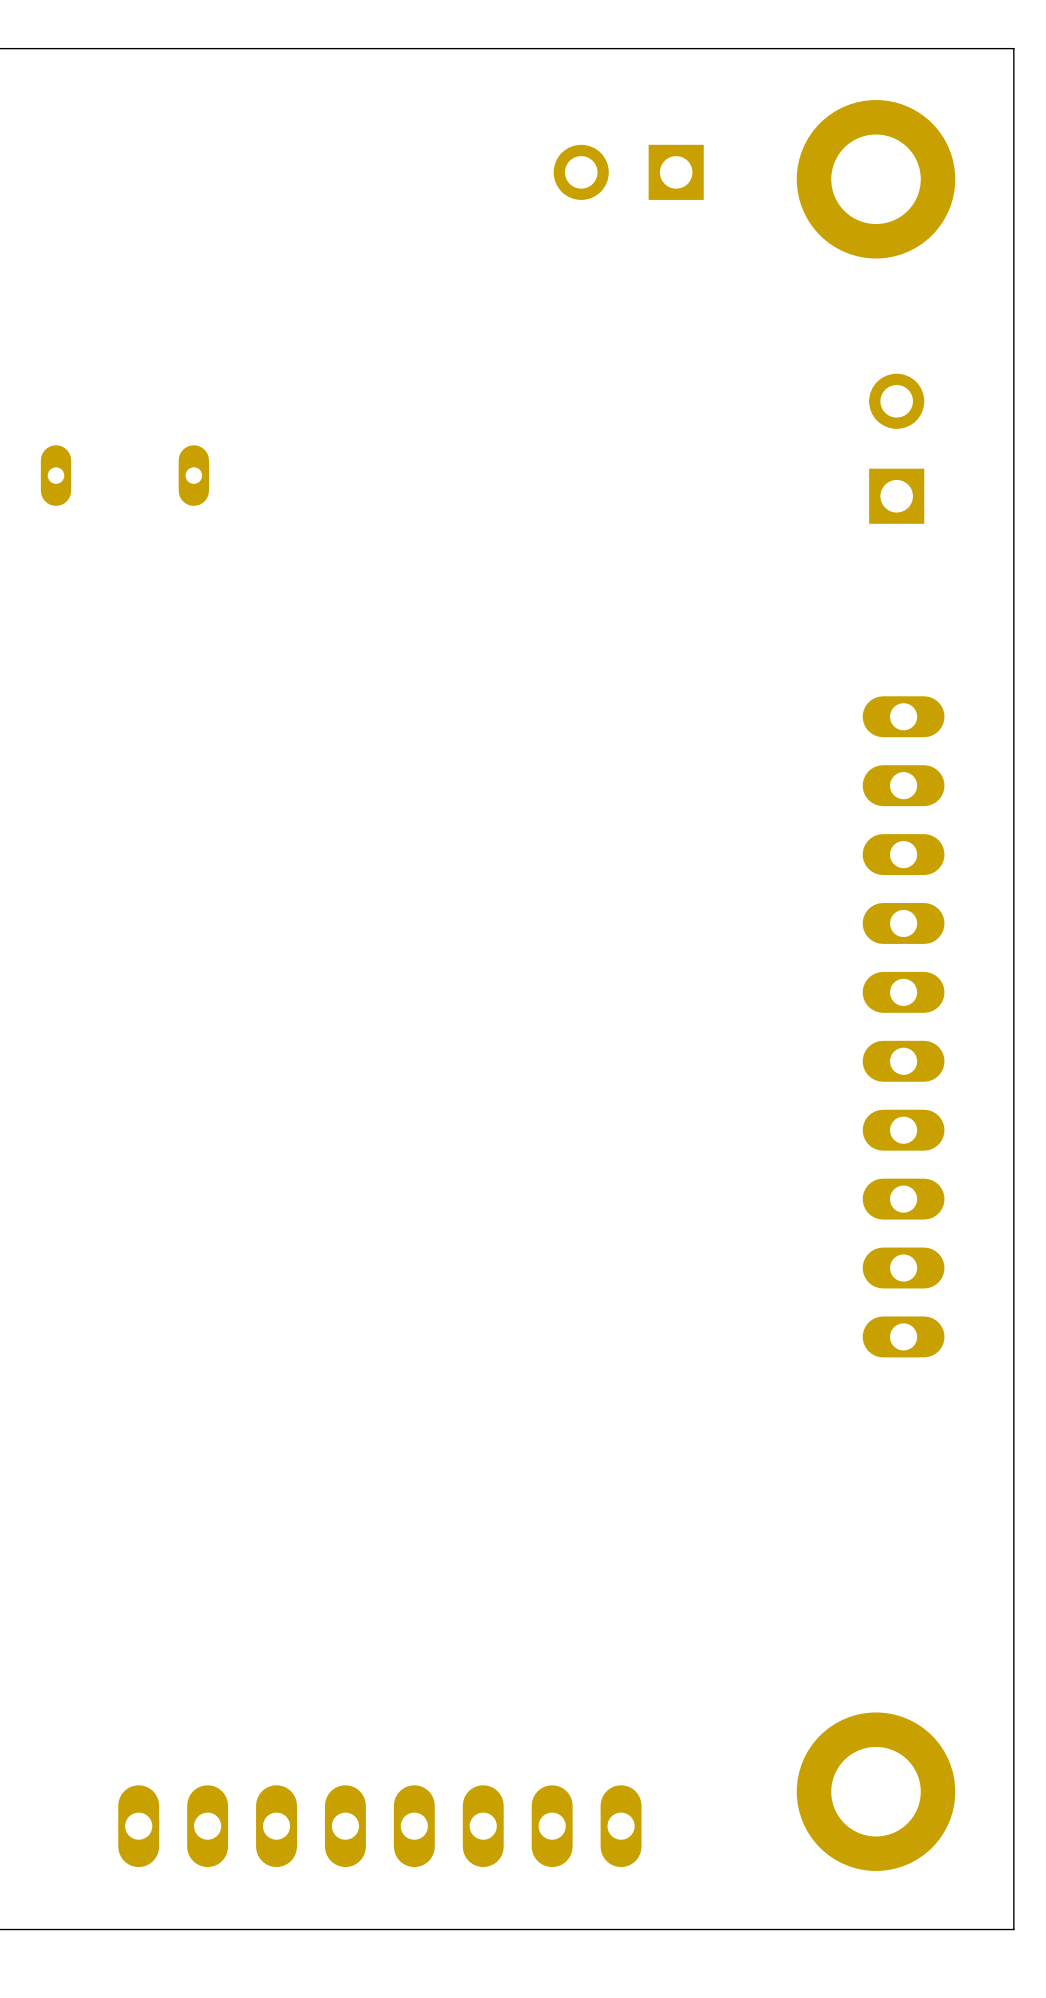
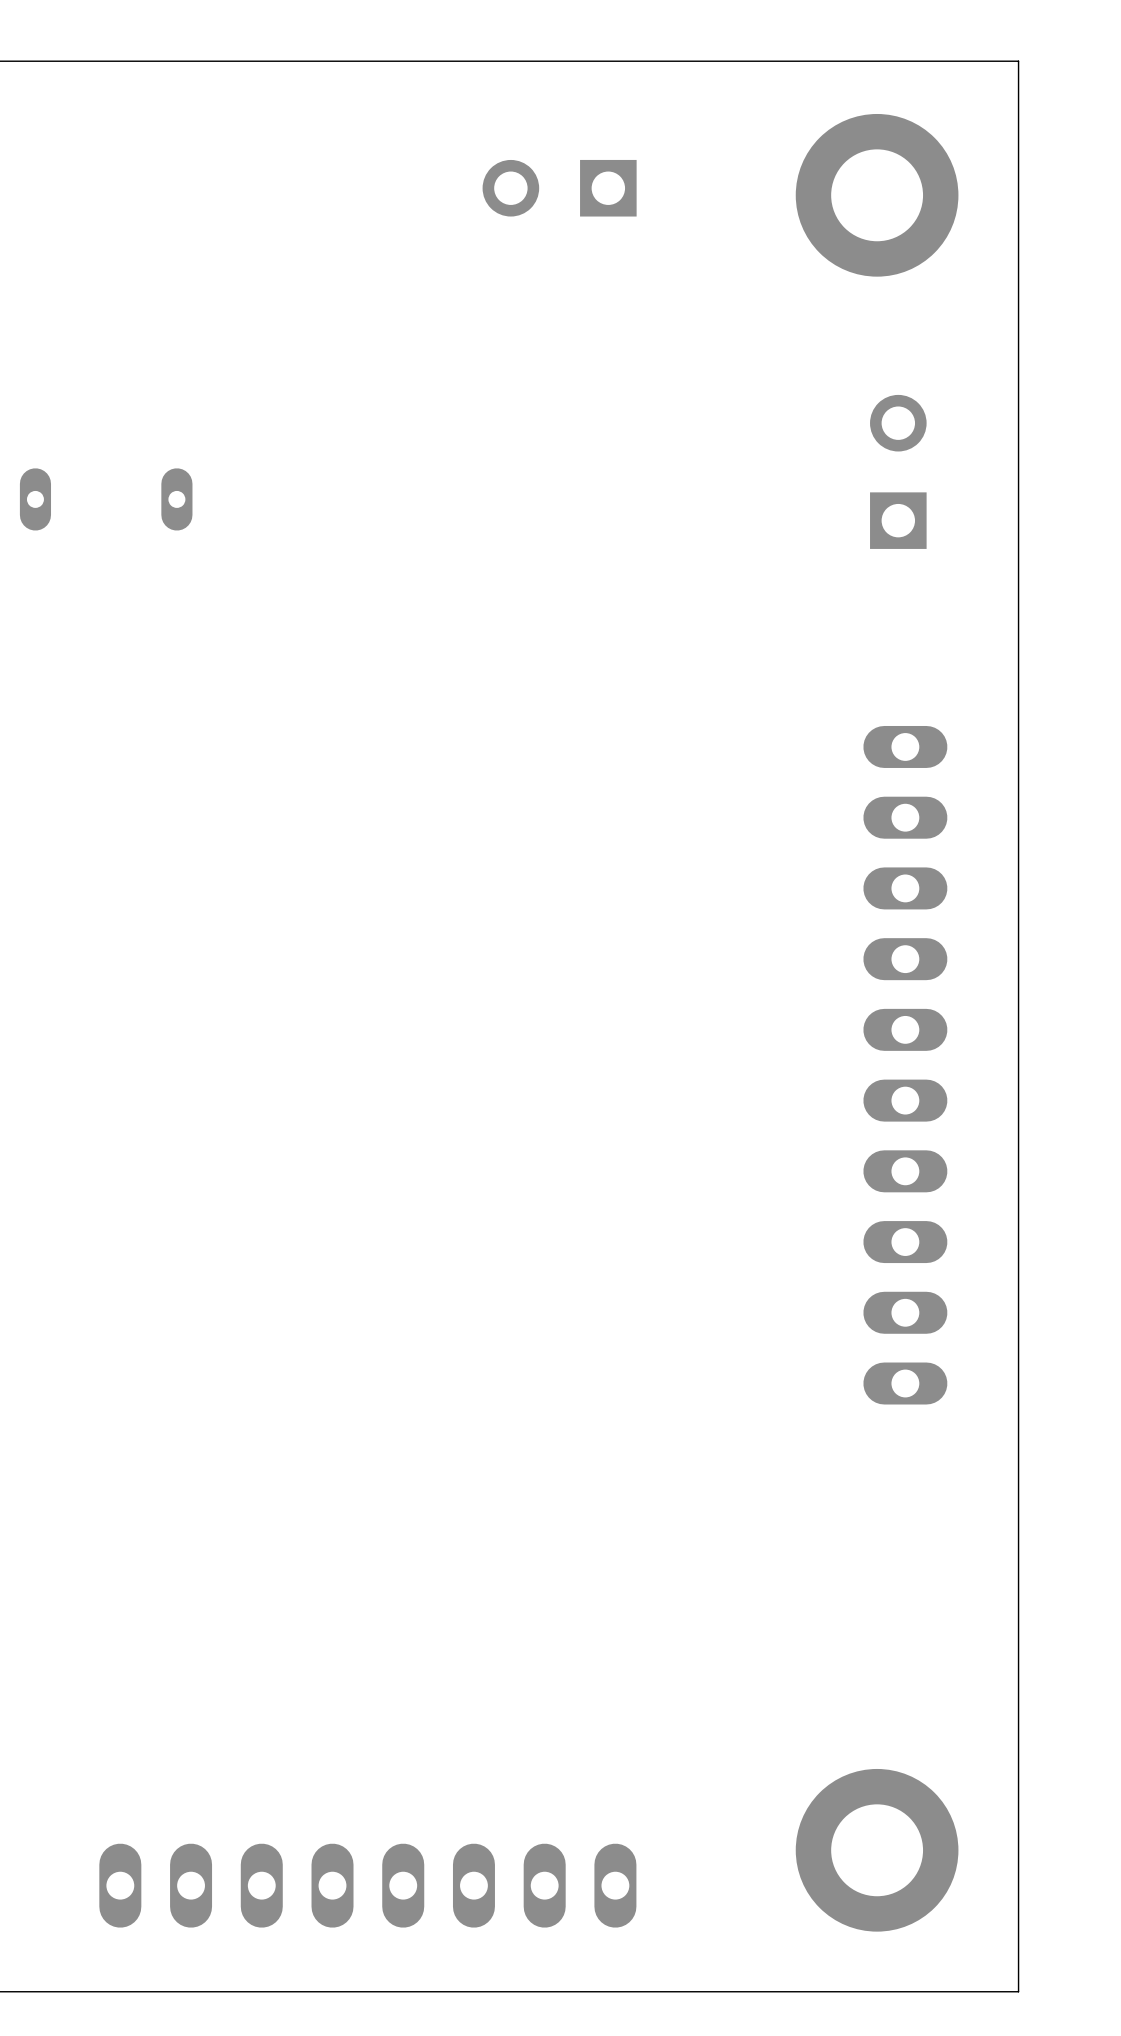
part position: (628, 172) -> (559, 188)

